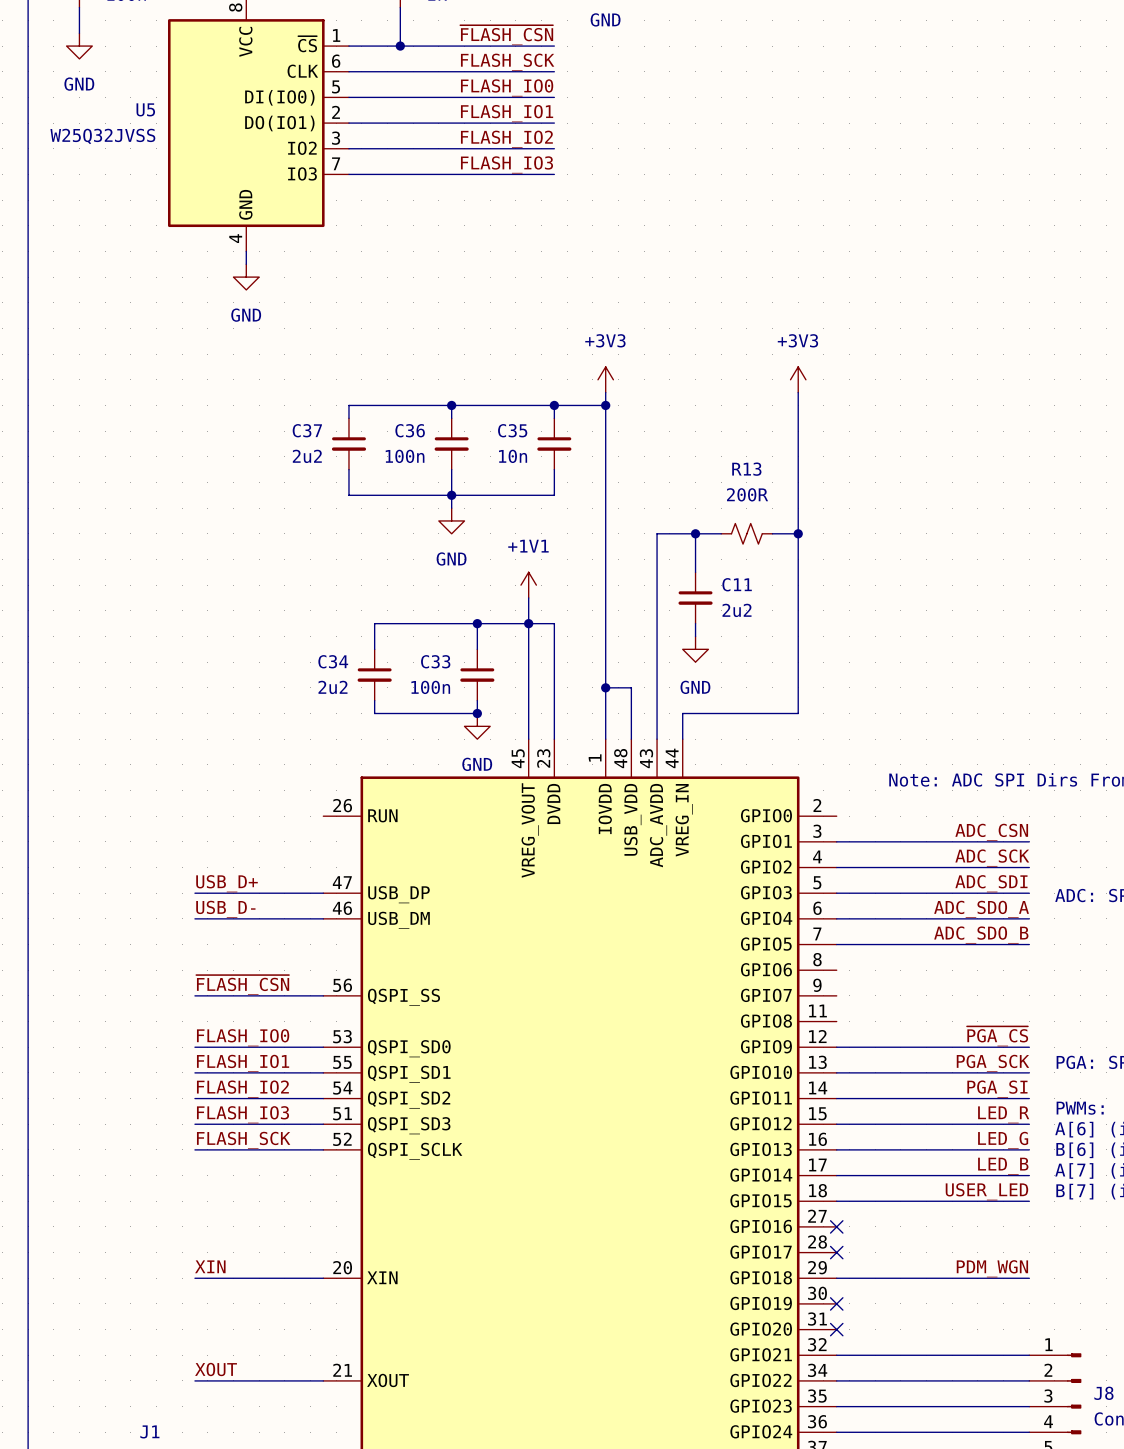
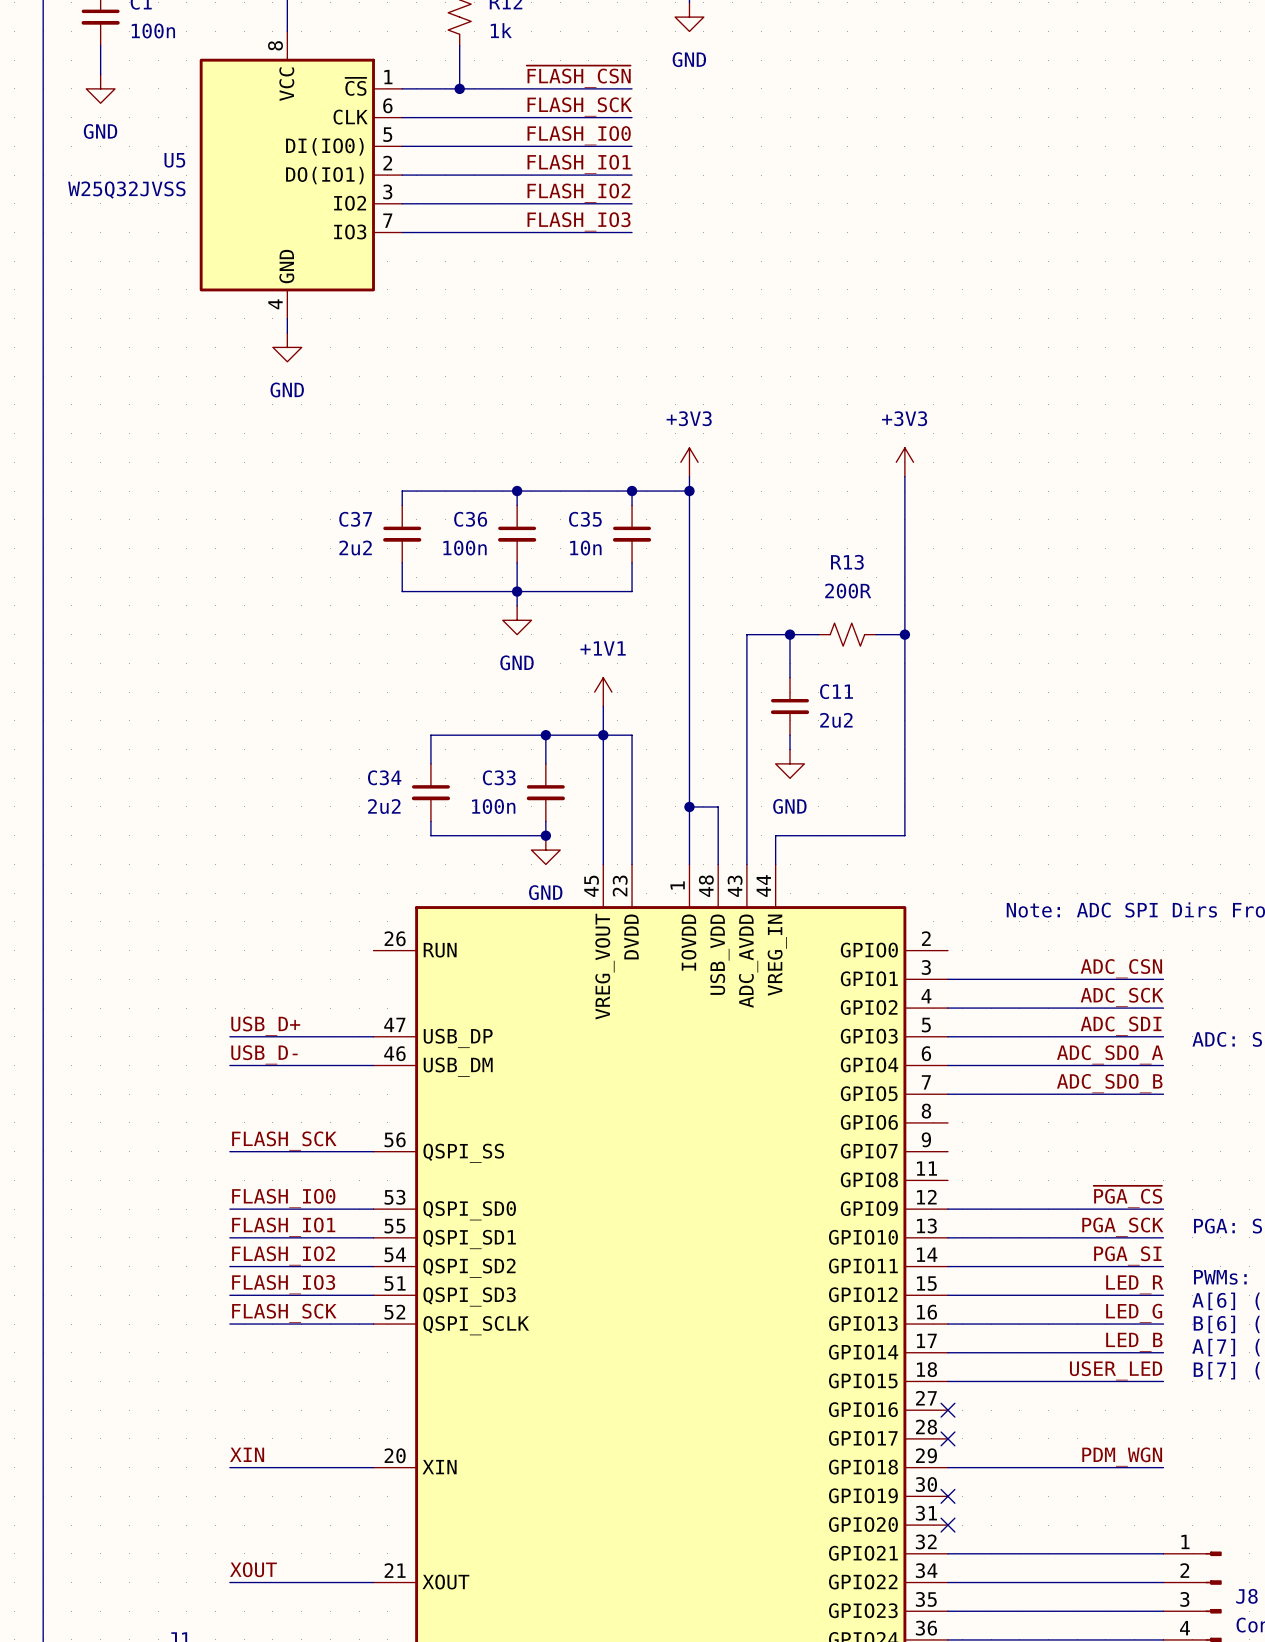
label: ~{FLASH_CSN} (242, 985) -> FLASH_SCK (284, 1141)

